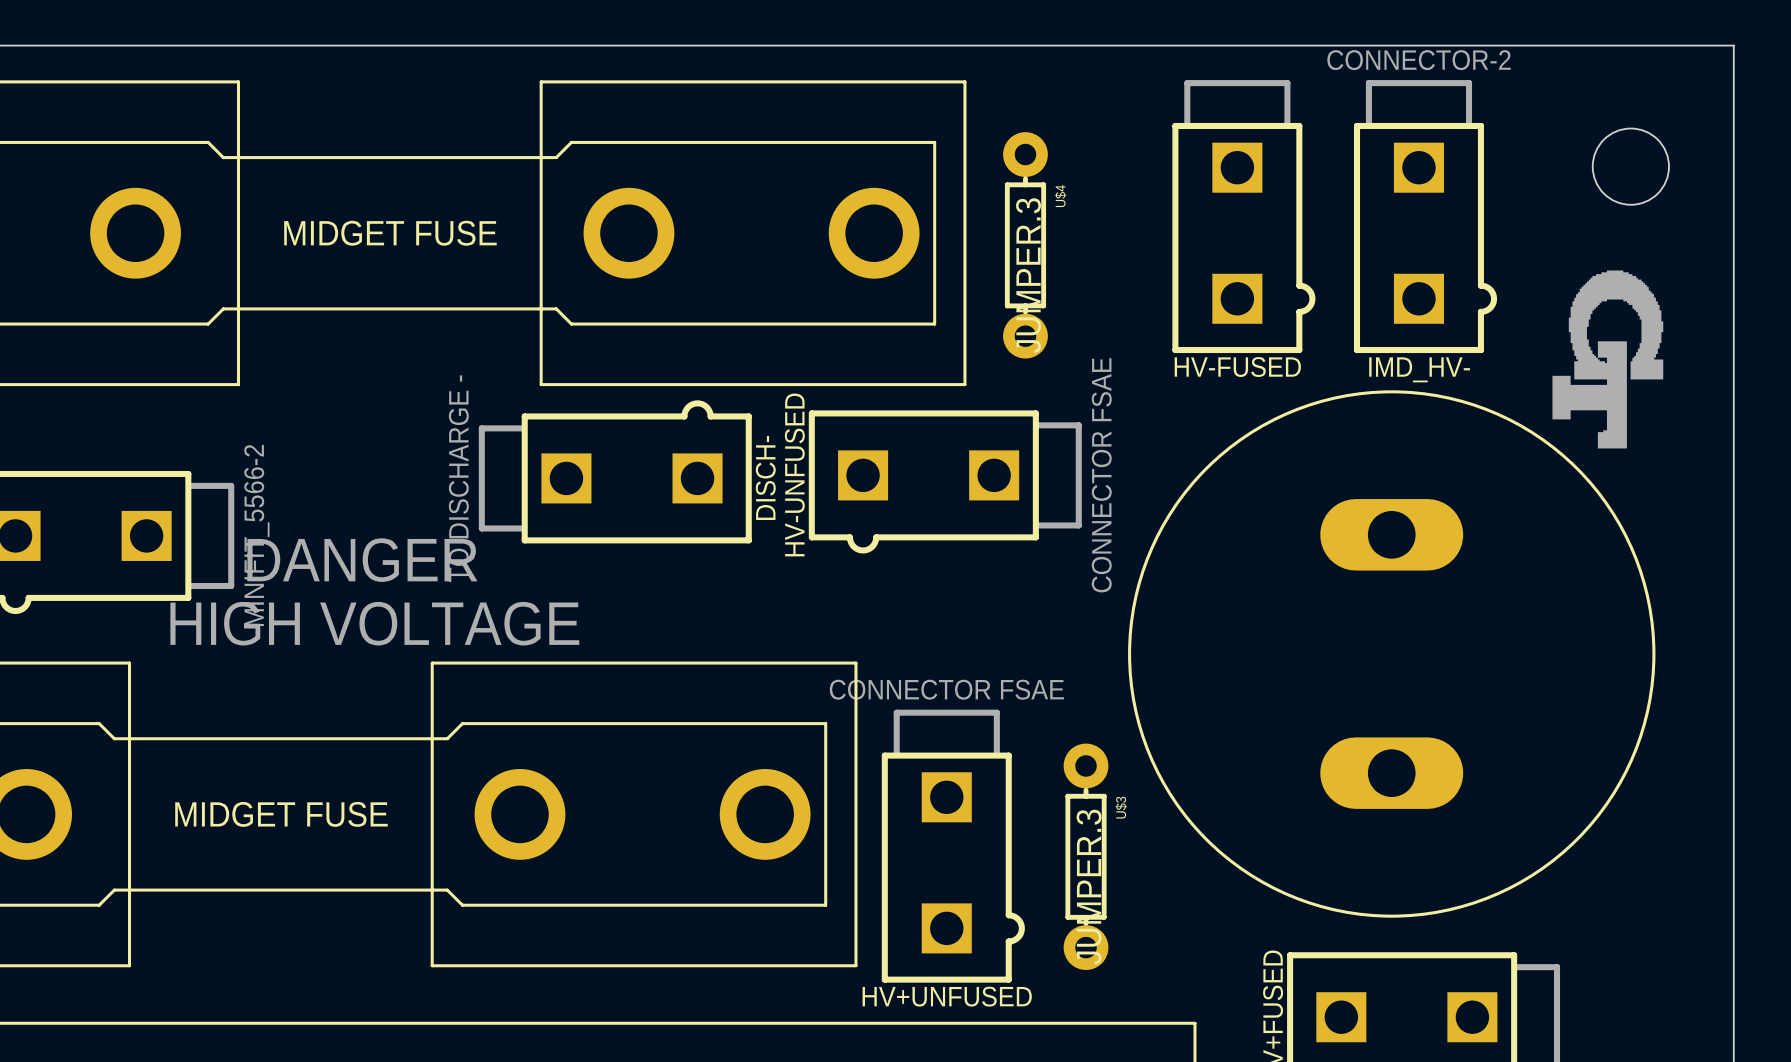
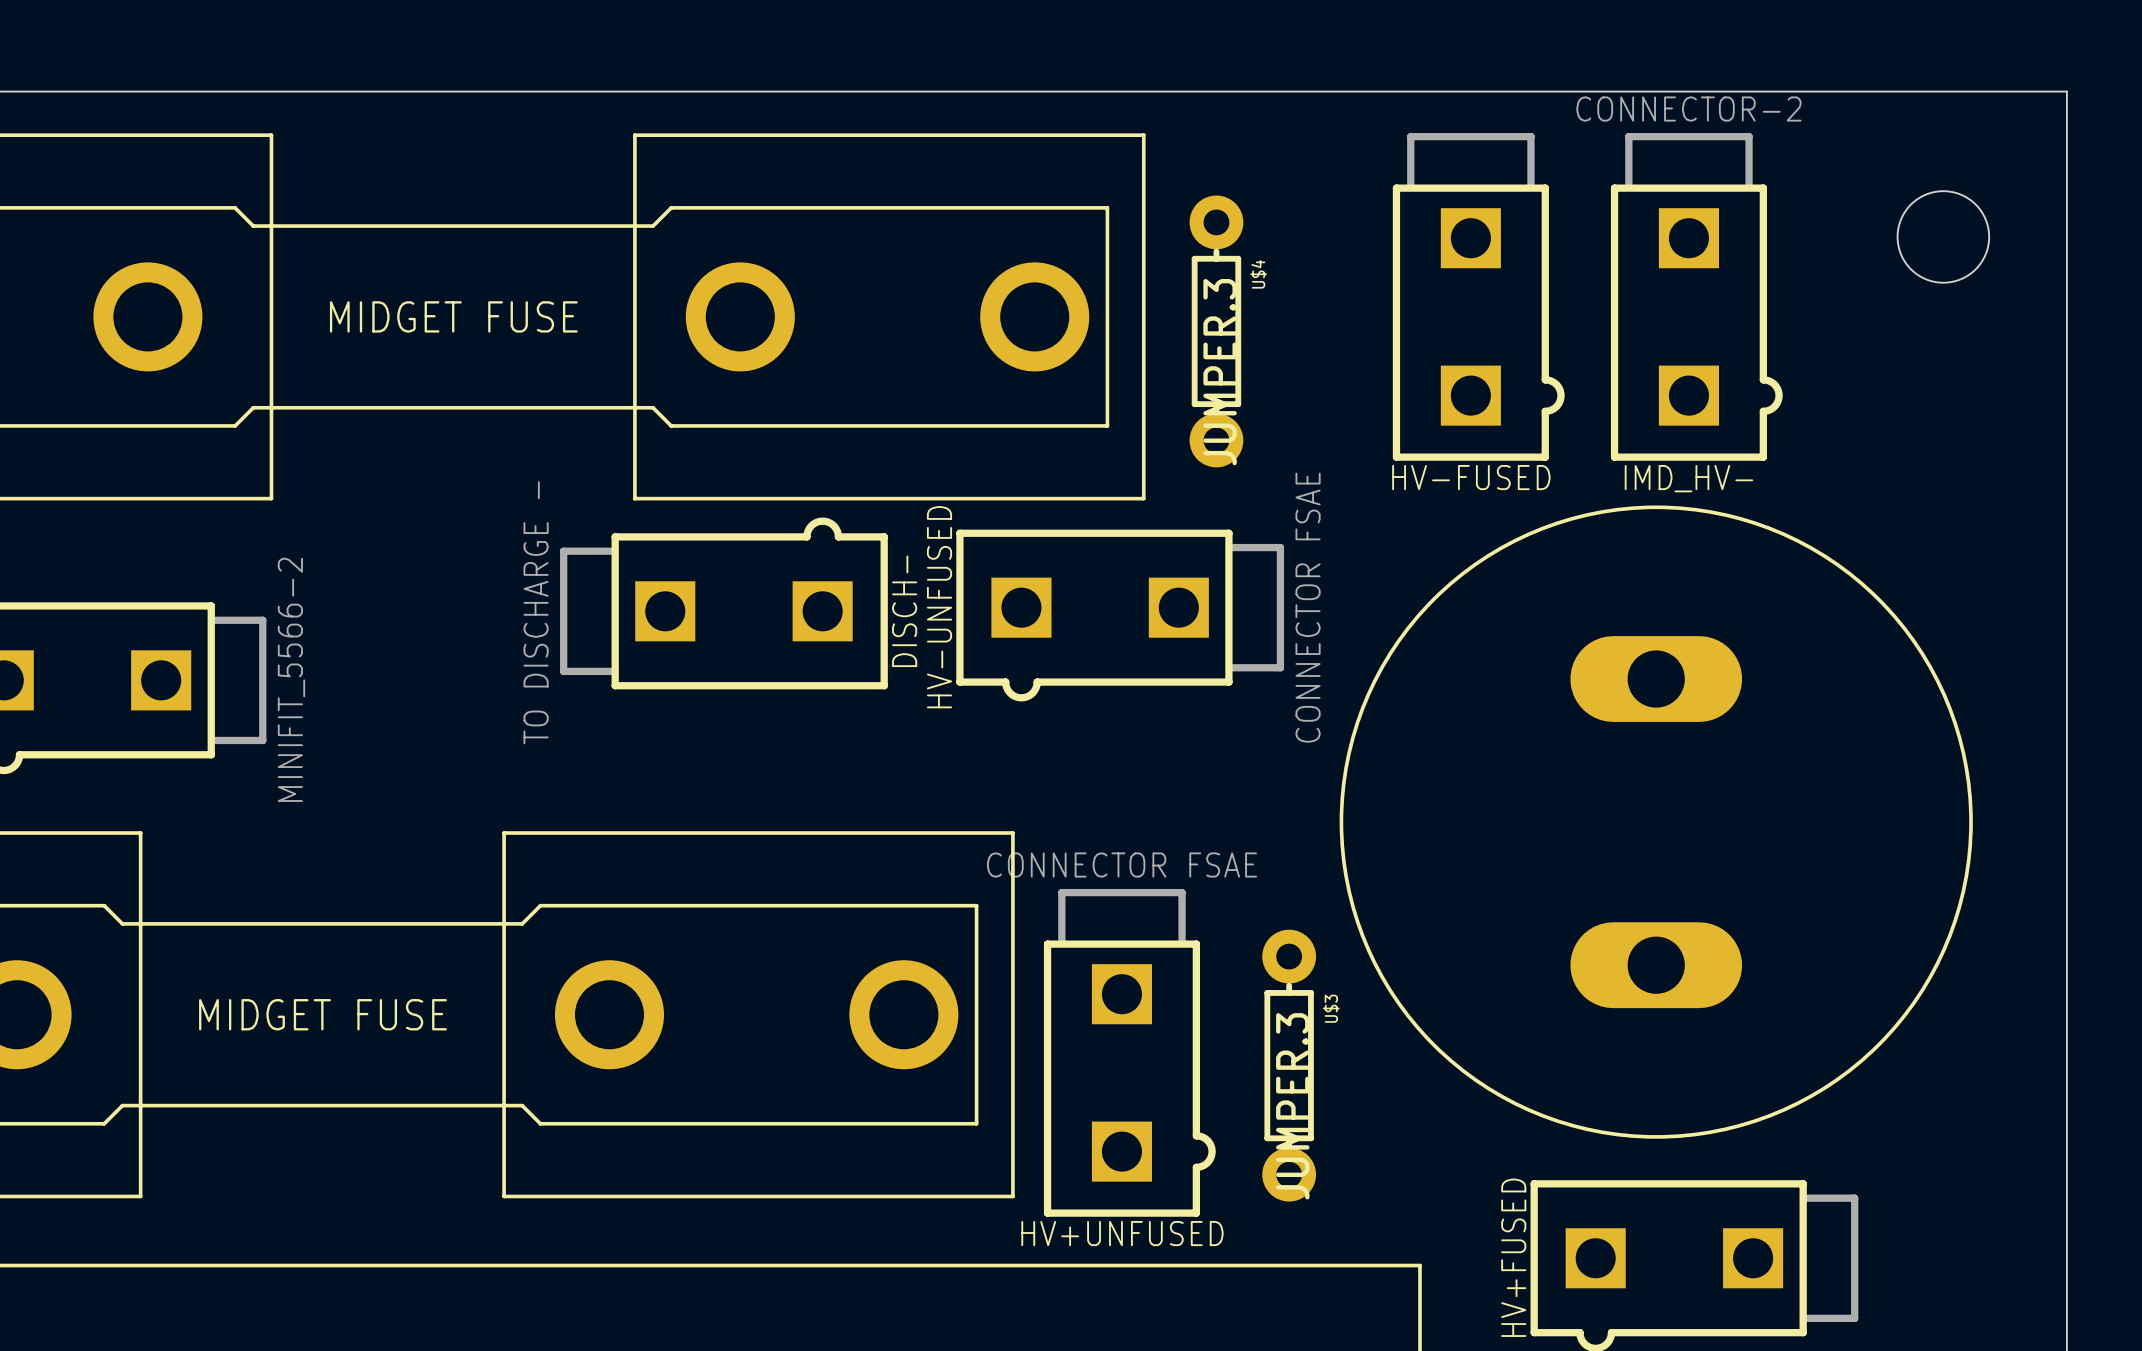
drawing: [1552, 270, 1664, 449] -> none
text: DANGER (362, 560) -> none
text: HIGH VOLTAGE (374, 623) -> none

